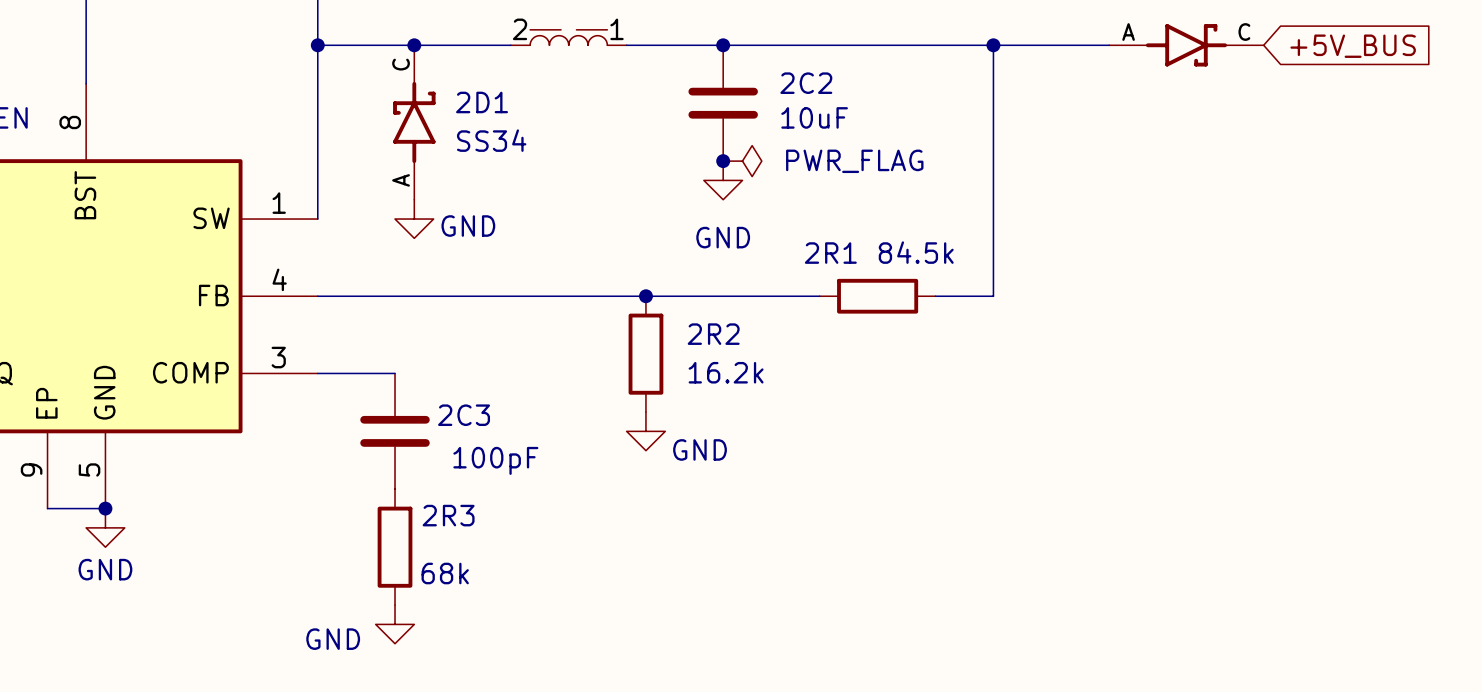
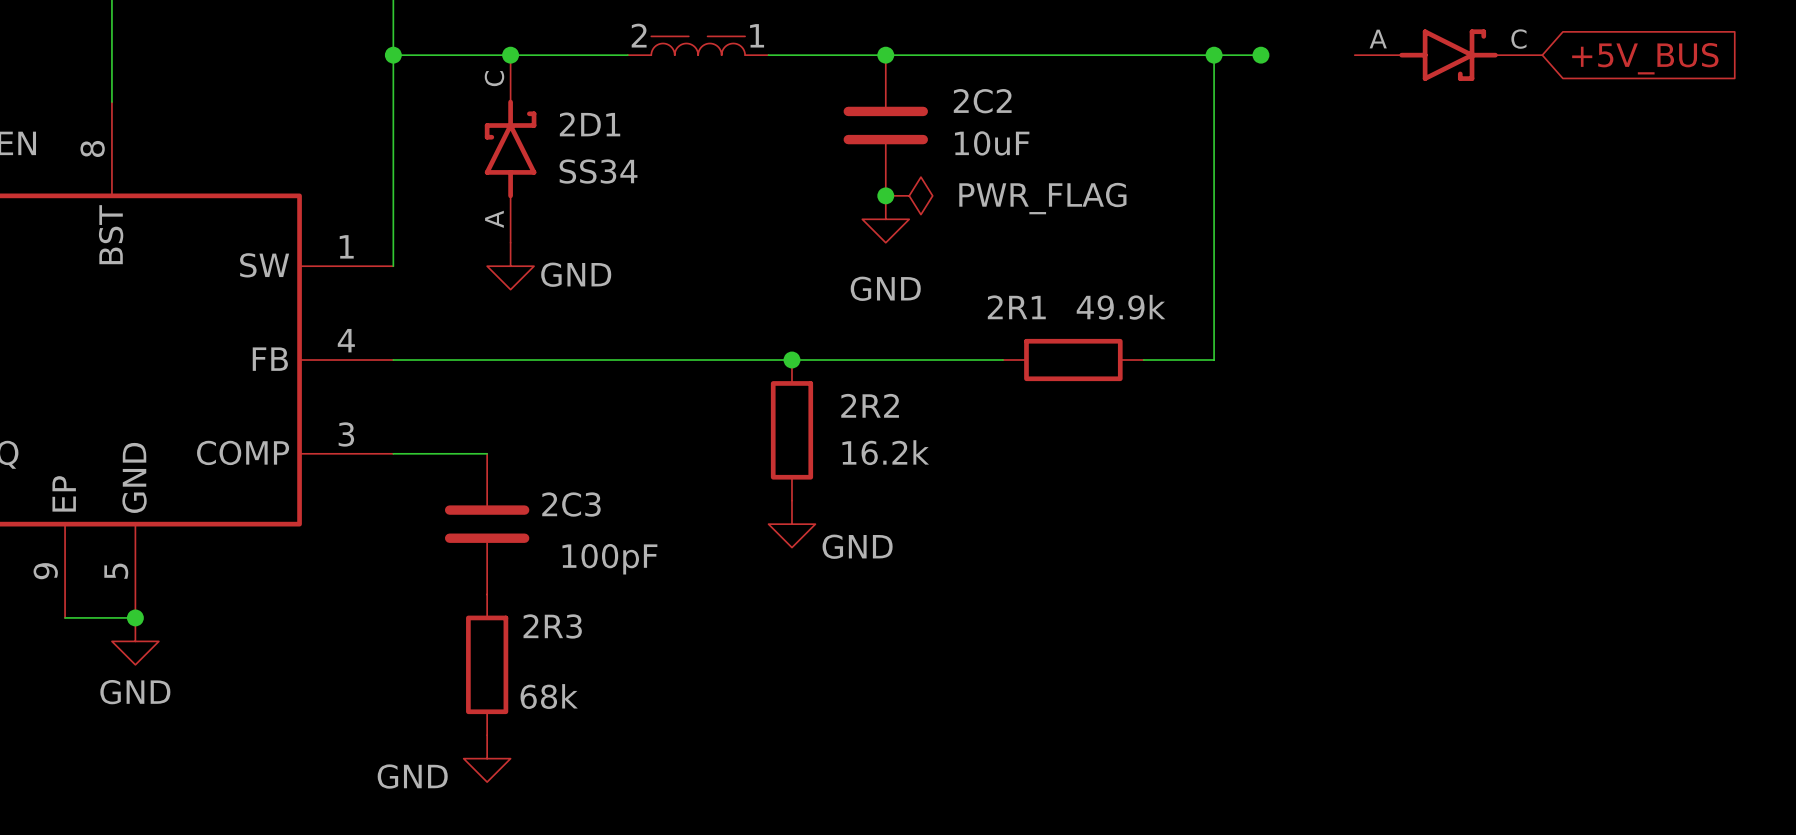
wire: (1032, 45) (1109, 45) -> none
junction: none -> (1260, 55)
2R1 value: 84.5k (916, 252) -> 49.9k (1121, 307)

